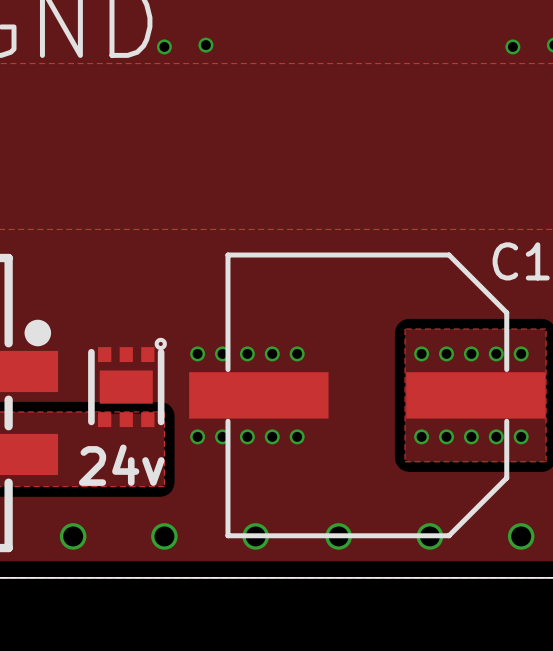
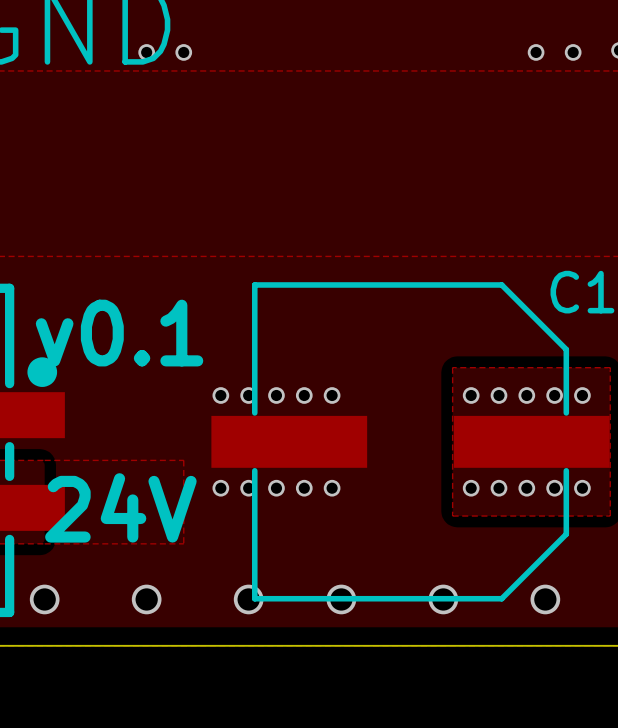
via position: (205, 45) -> (146, 52)
via: none -> (536, 52)
text: none -> v0.1 (119, 333)
part: (127, 382) -> none
text: 24v (121, 465) -> 24V (120, 507)
via: none -> (44, 599)
via: (73, 536) -> none
via: none -> (146, 599)
via: (164, 536) -> none
via: none -> (248, 599)
via: (255, 536) -> none
via: none -> (341, 599)
via: (338, 536) -> none
via: none -> (443, 599)
via: (429, 536) -> none
via: none -> (545, 599)
via: (521, 536) -> none

